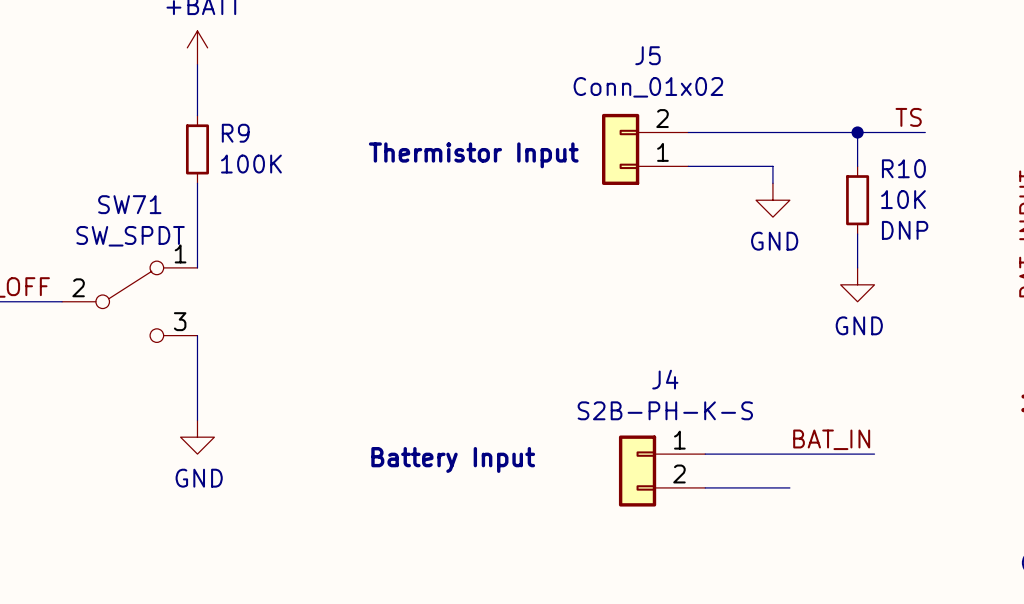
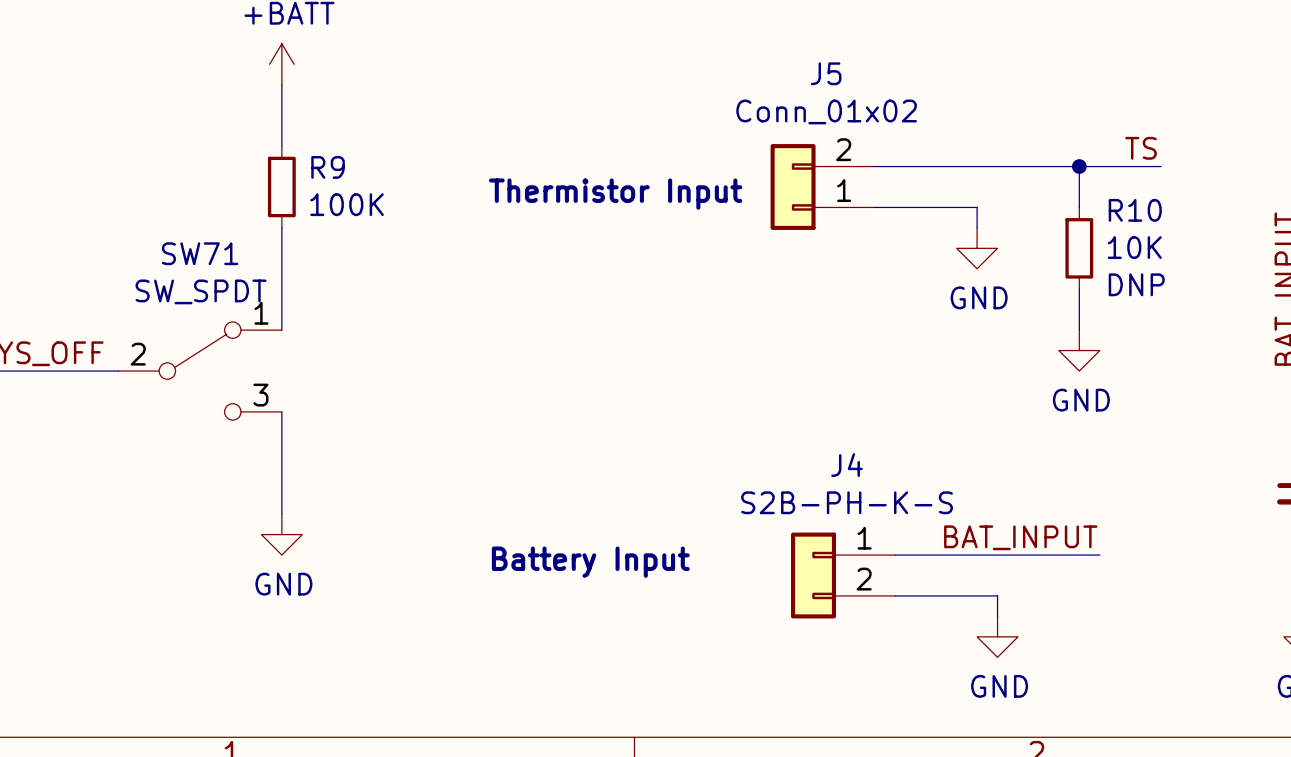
label: BAT_IN (831, 439) -> BAT_INPUT (1020, 537)
wire: none -> (997, 595) (997, 616)
power symbol: none -> GND (997, 636)

